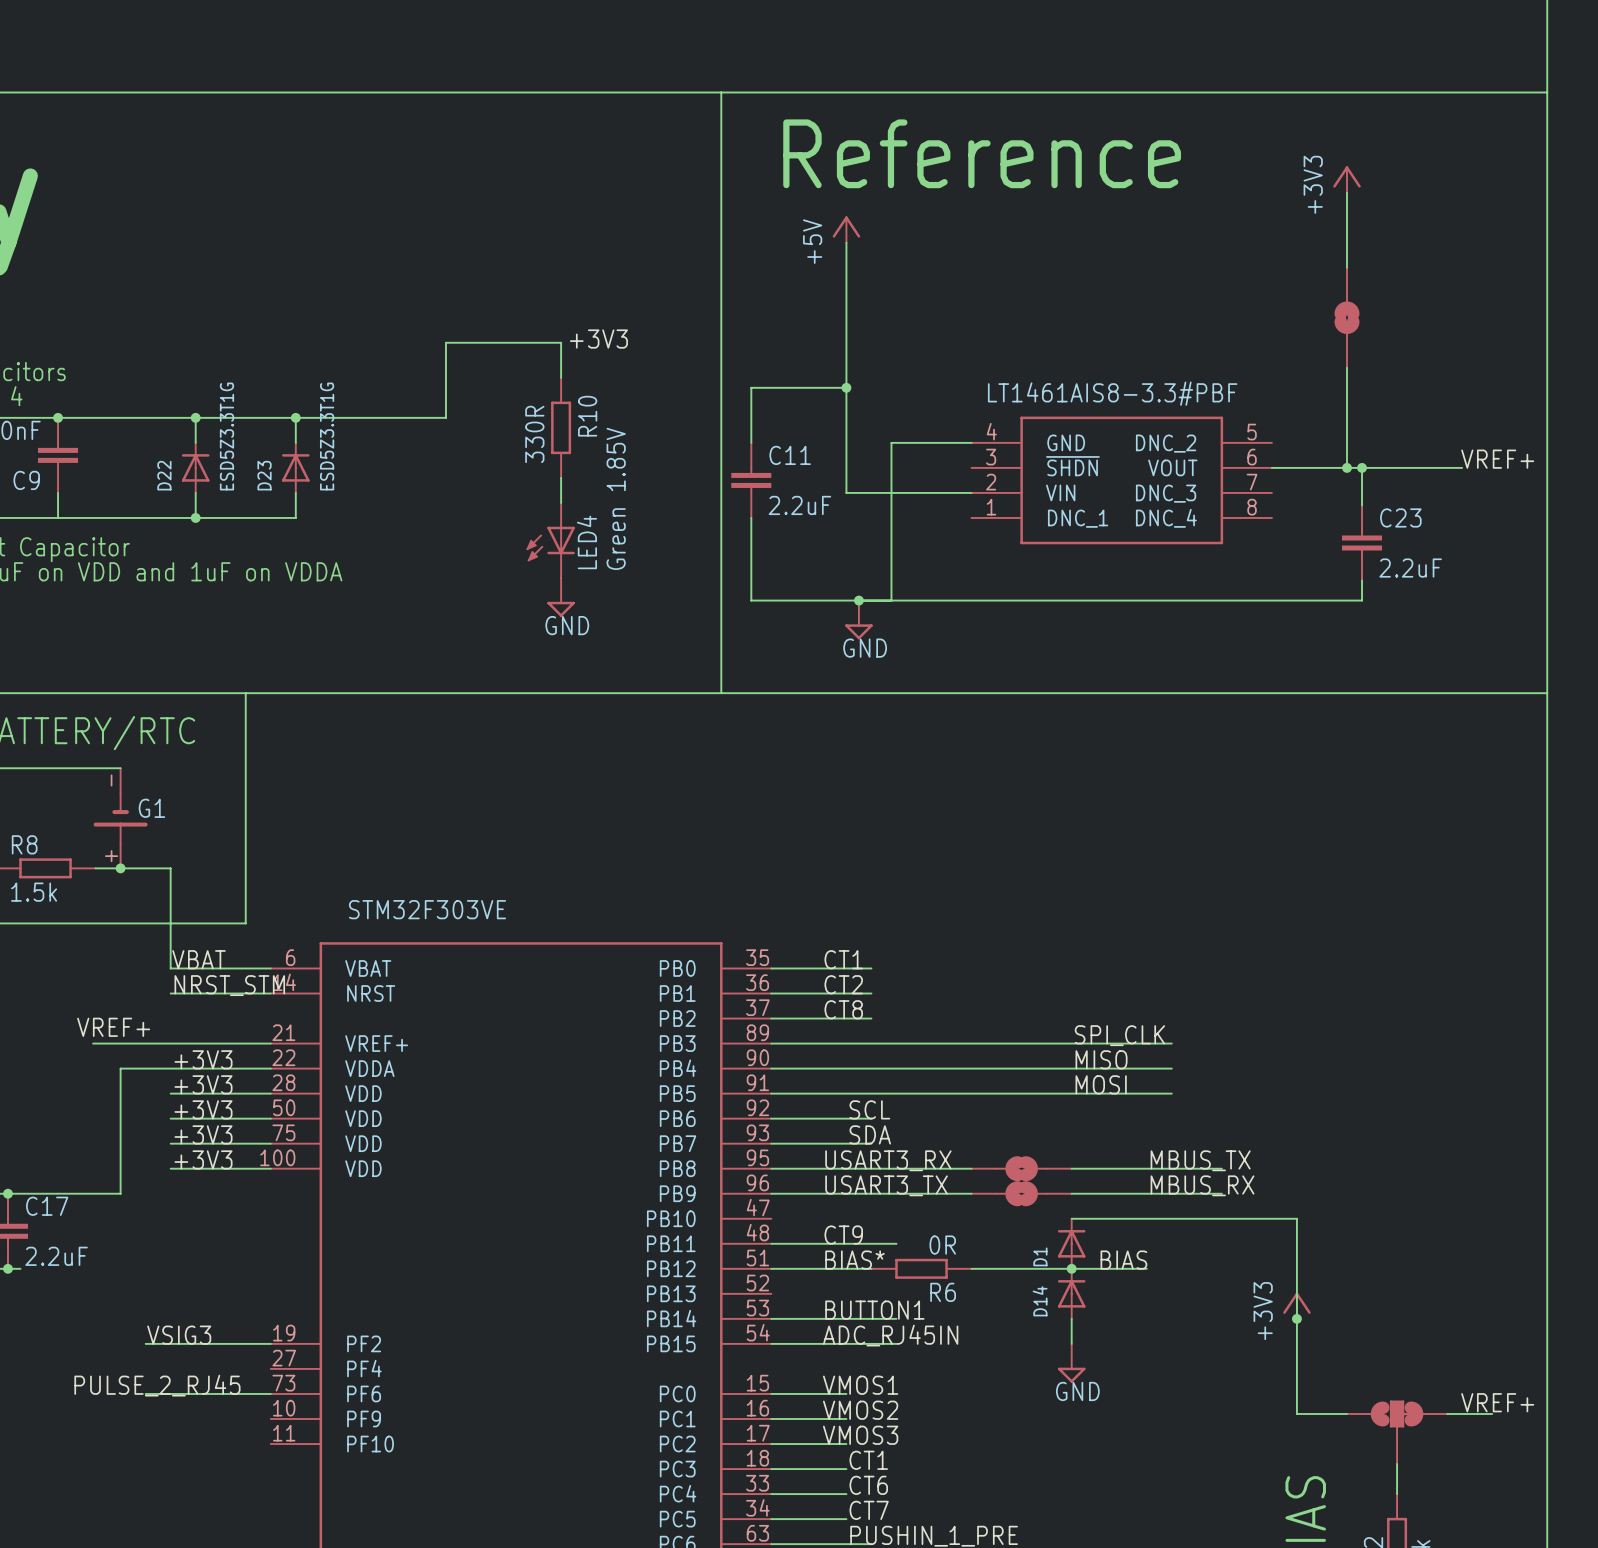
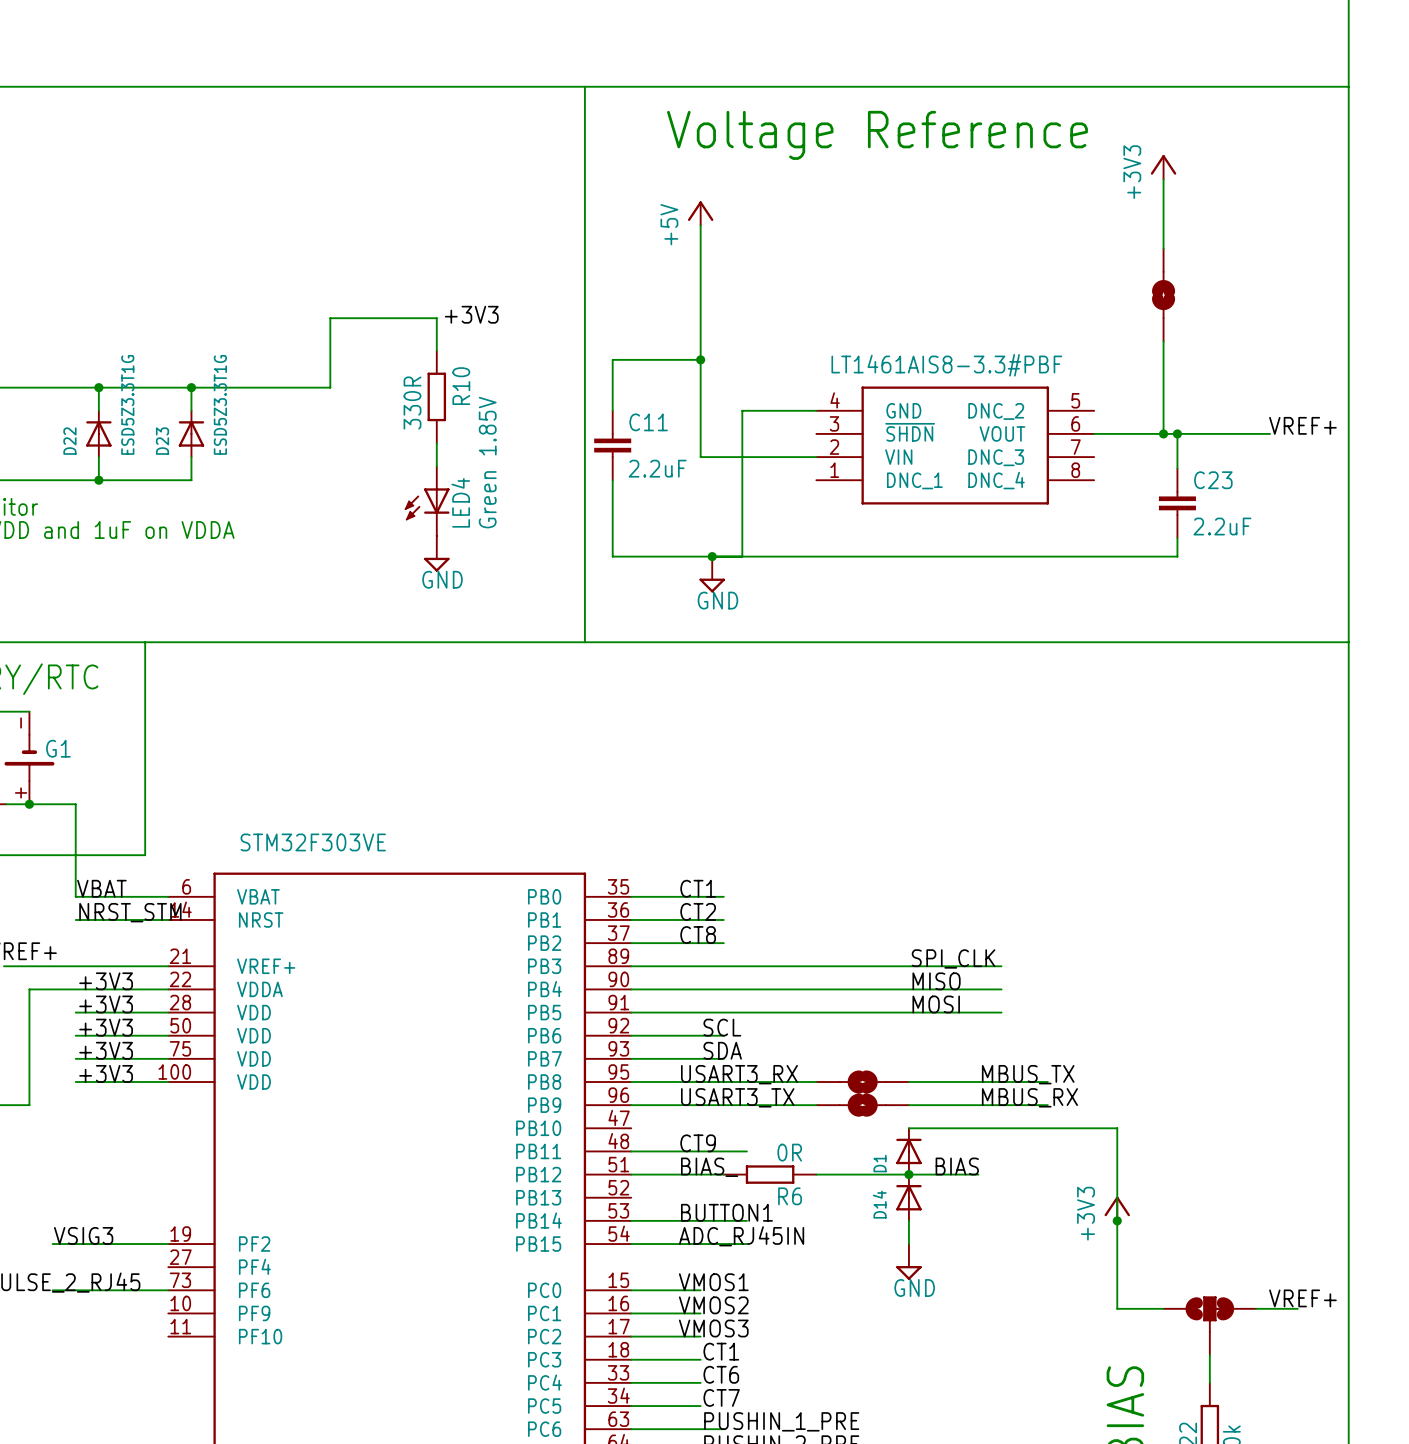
text: Reference (982, 153) -> Voltage Reference (877, 135)
label: BIAS* (854, 1260) -> BIAS_ (709, 1167)

